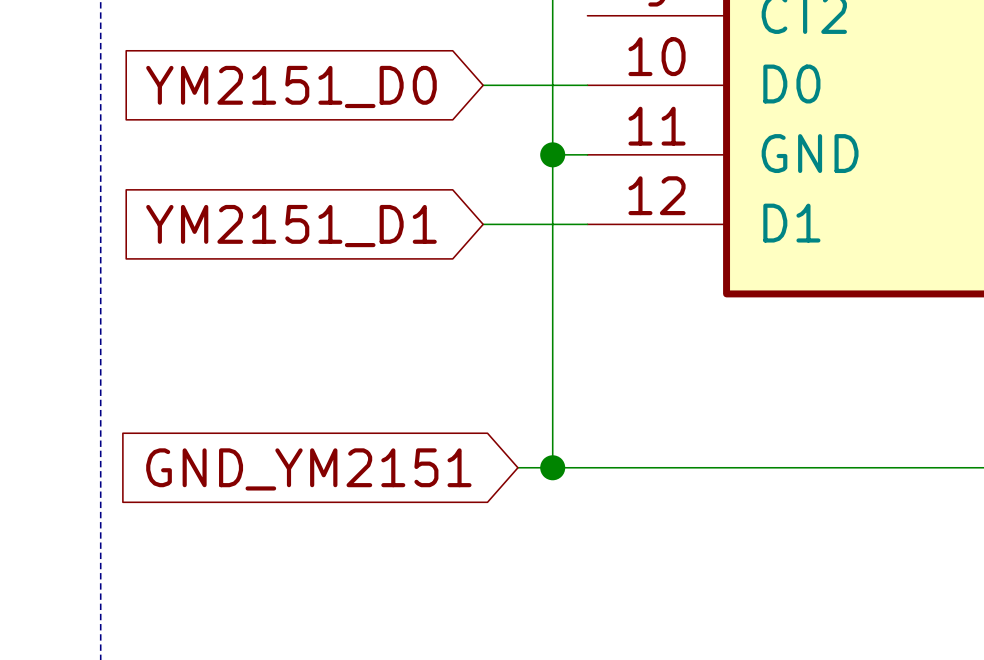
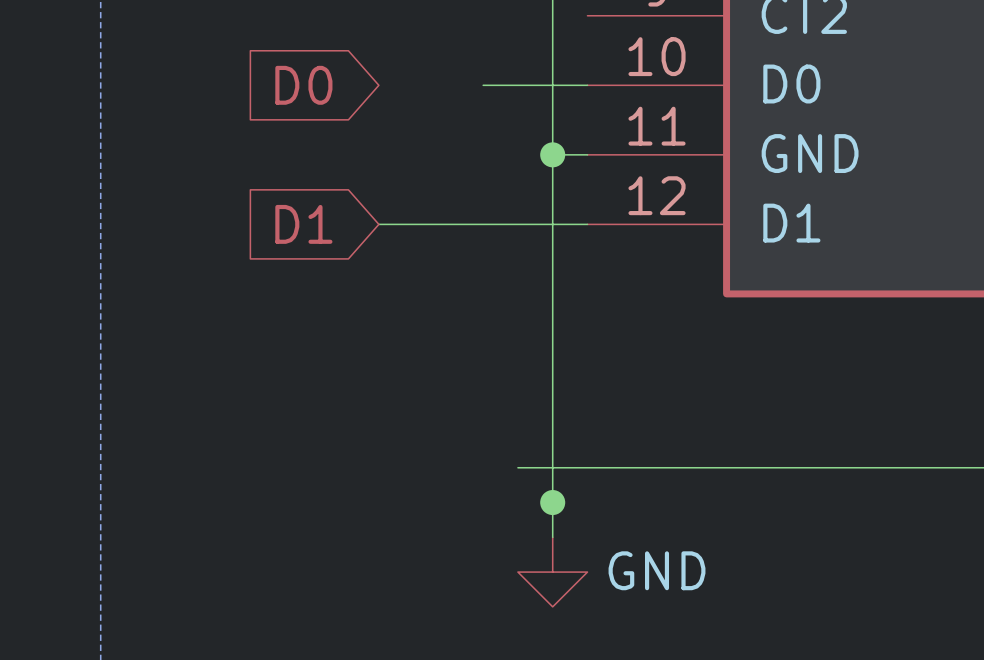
global label: none -> D0 (303, 85)
global label: YM2151_D0 (291, 86) -> none
global label: none -> D1 (303, 224)
wire: none -> (378, 224) (483, 224)
global label: YM2151_D1 (291, 226) -> none
wire: none -> (552, 467) (552, 537)
junction position: (552, 467) -> (552, 502)
global label: GND_YM2151 (308, 469) -> none
power symbol: none -> GND (552, 572)

